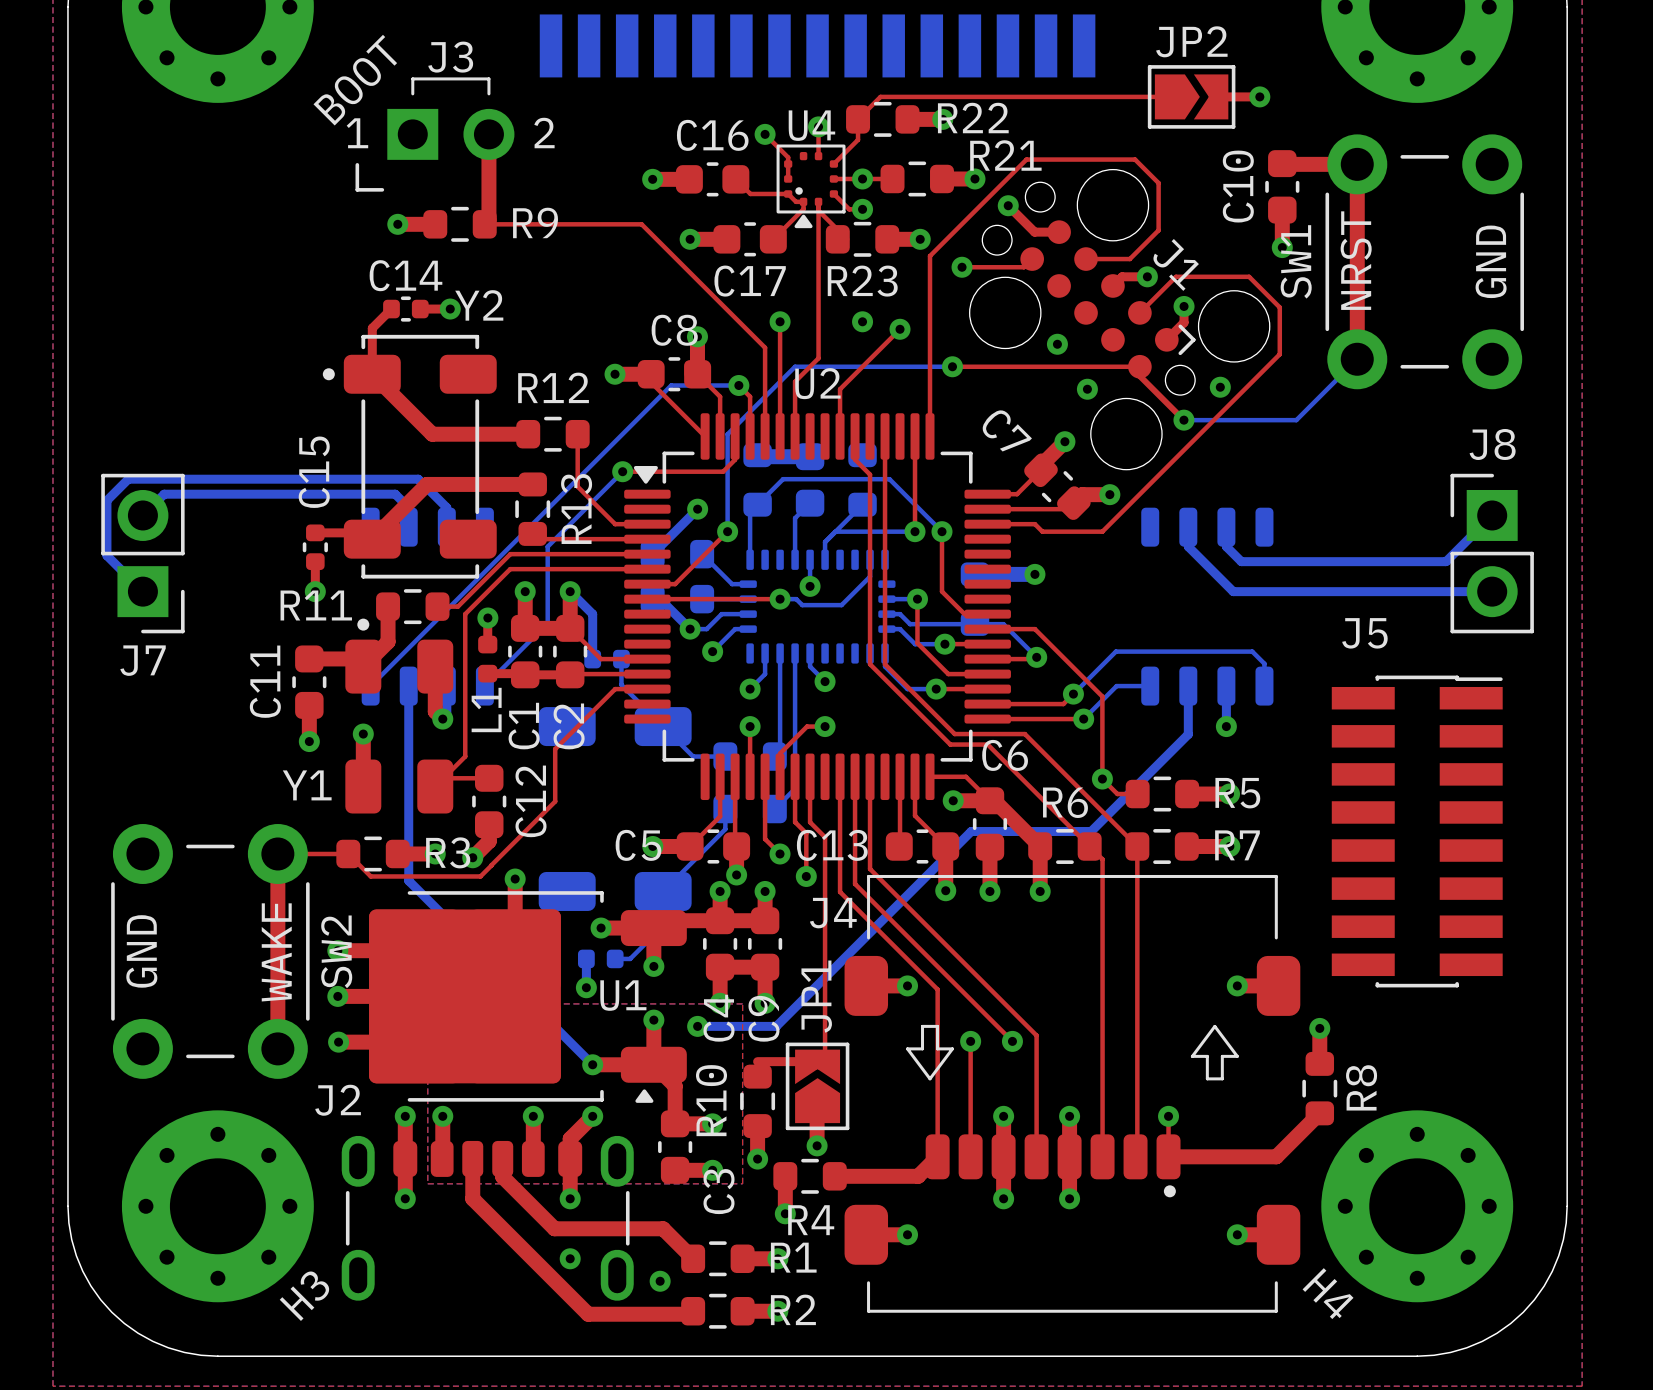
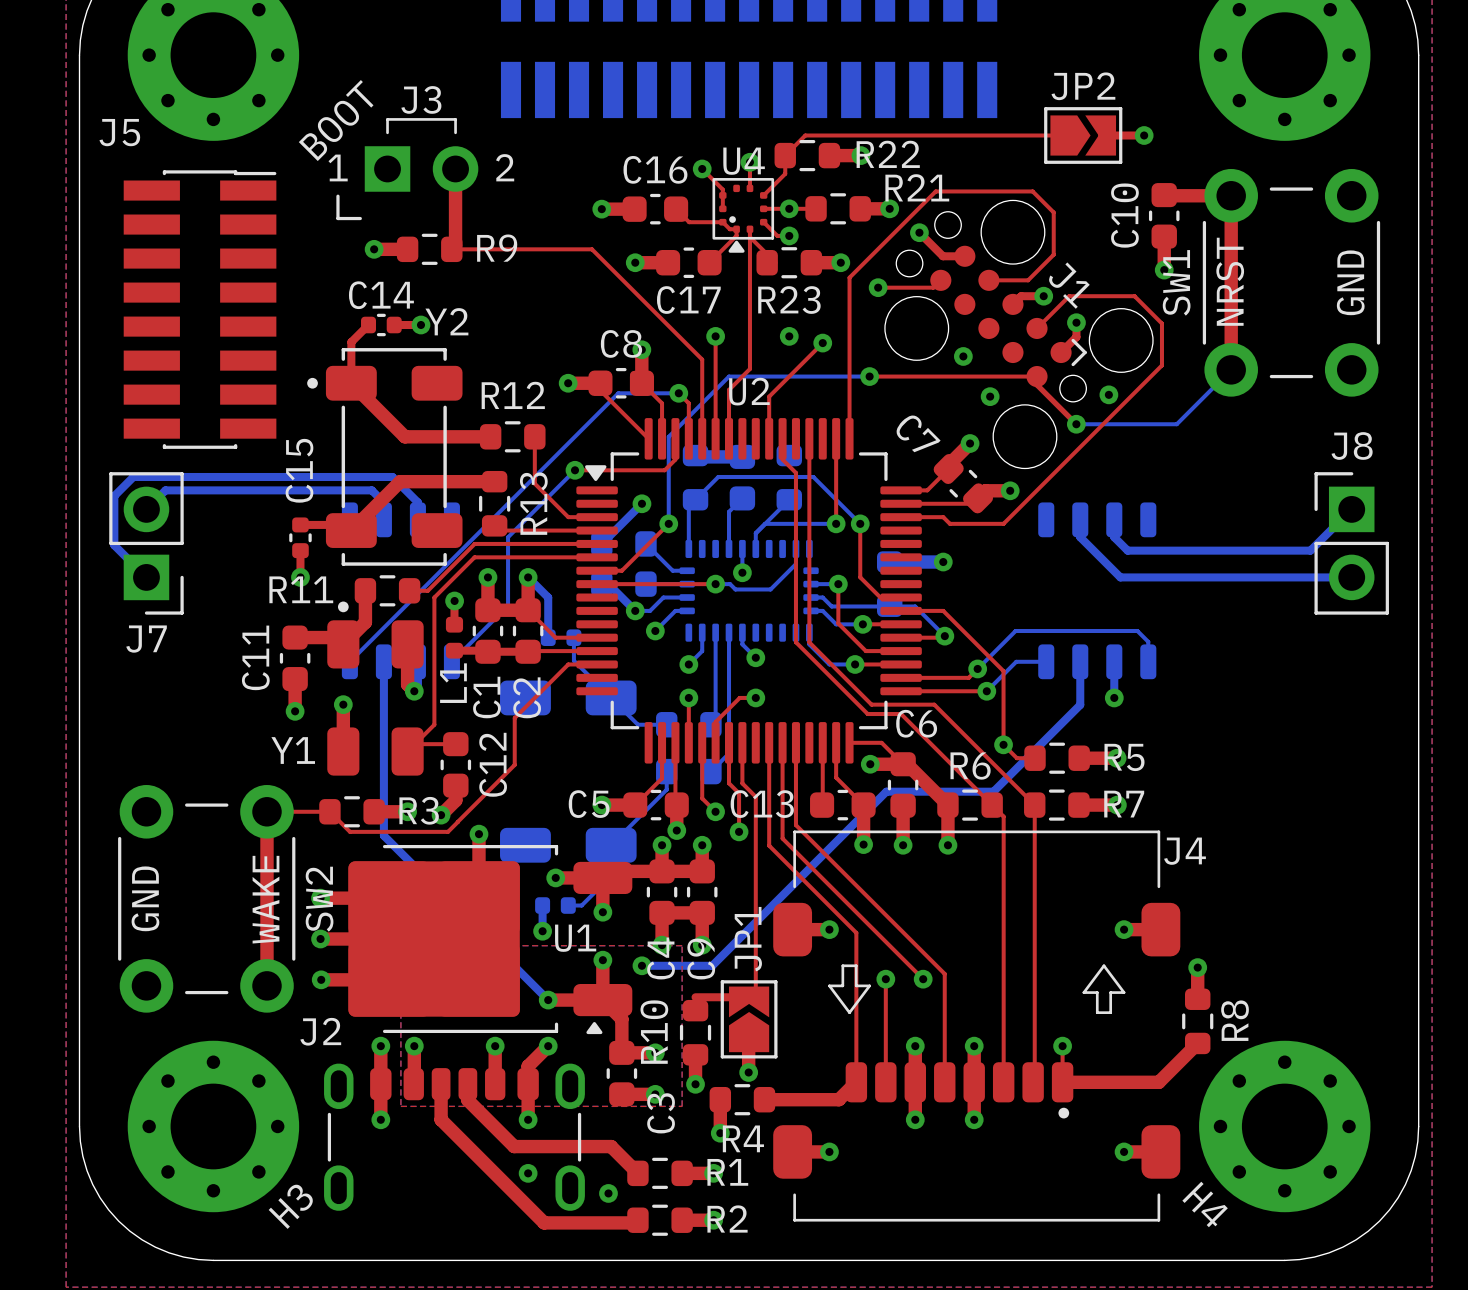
J5 name position: J5 (1364, 633) -> J5 (119, 132)
J5 position: (1417, 831) -> (200, 309)
J4 name position: J4 (833, 913) -> J4 (1185, 851)

